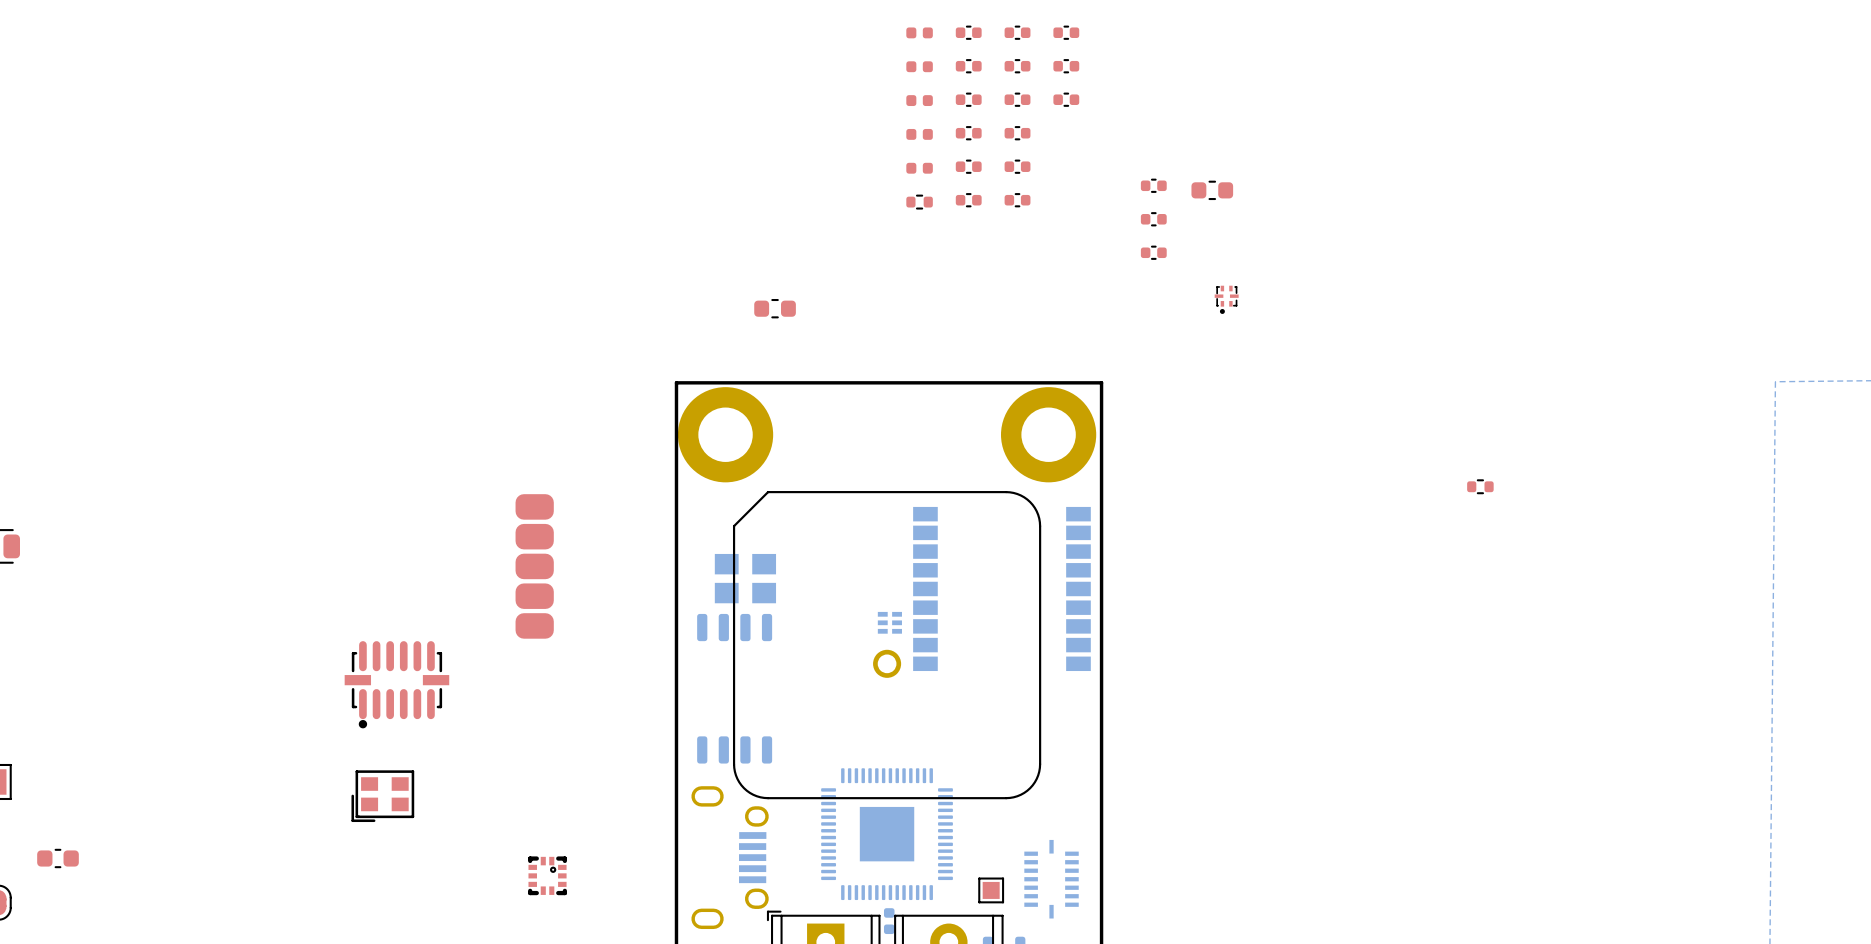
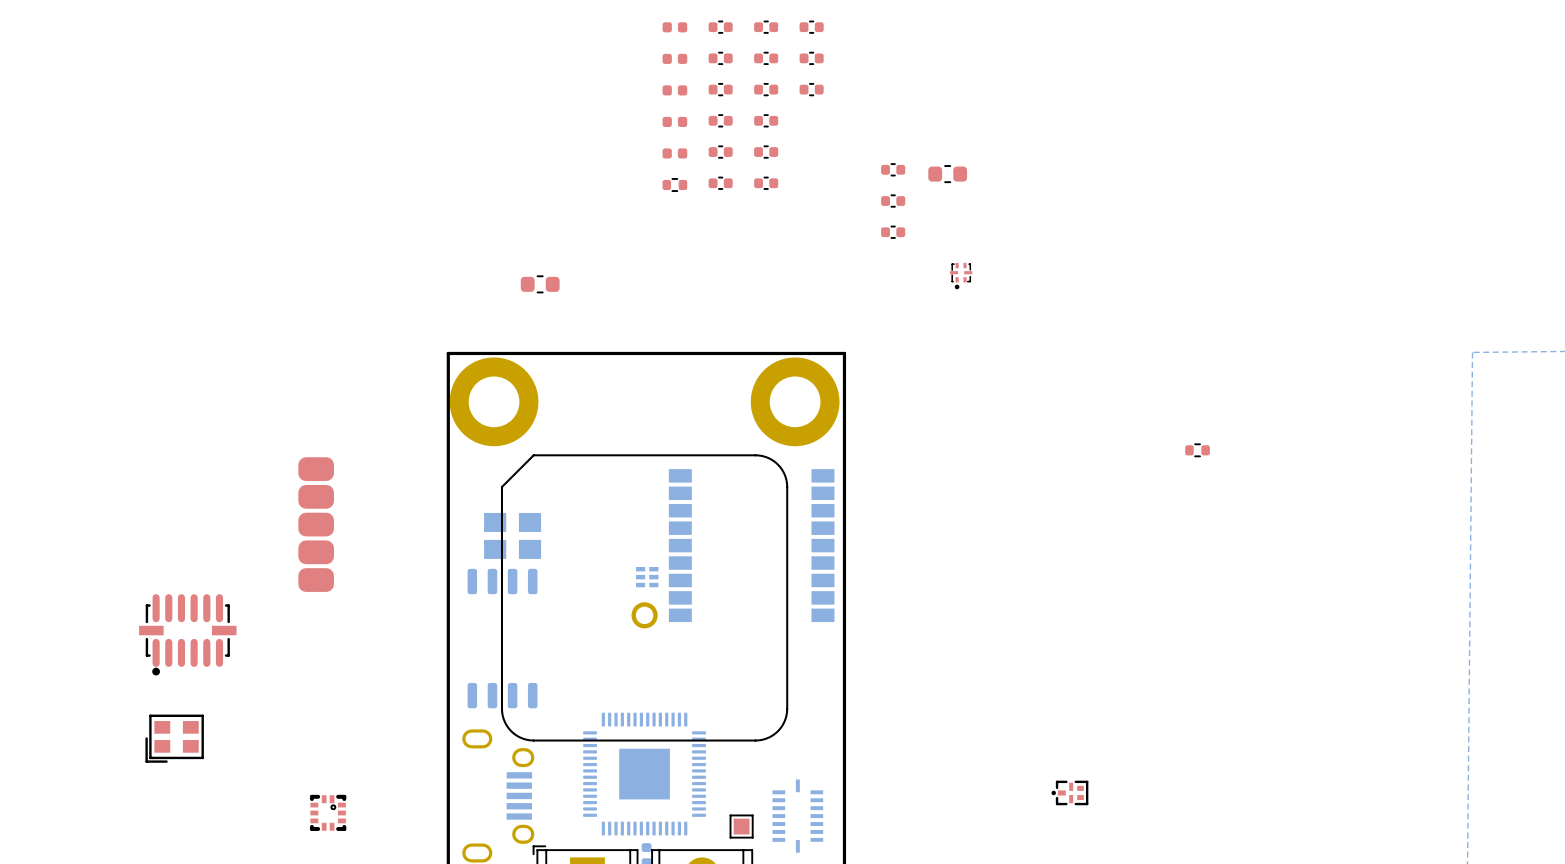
part: none -> (1069, 792)

